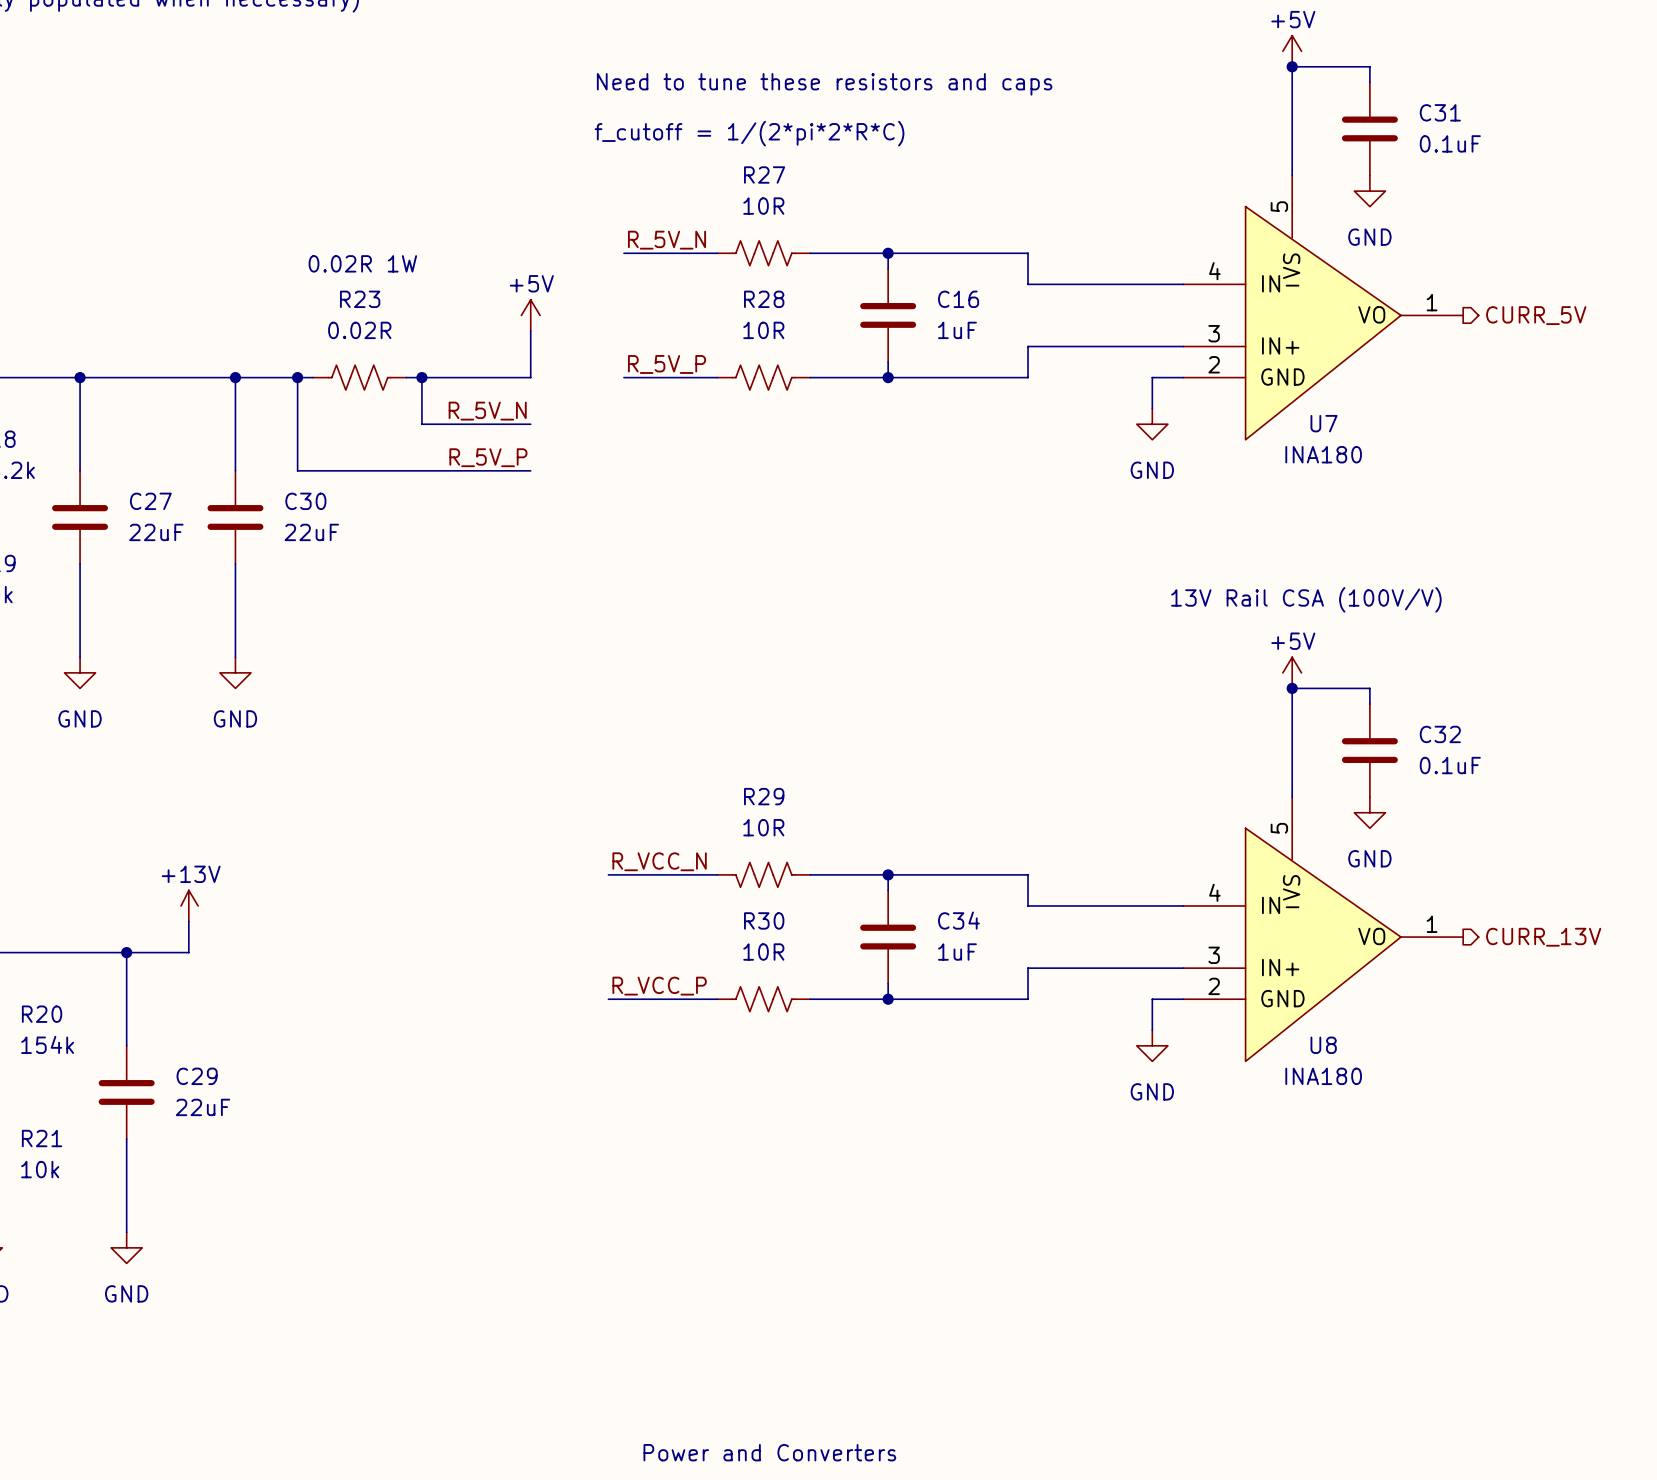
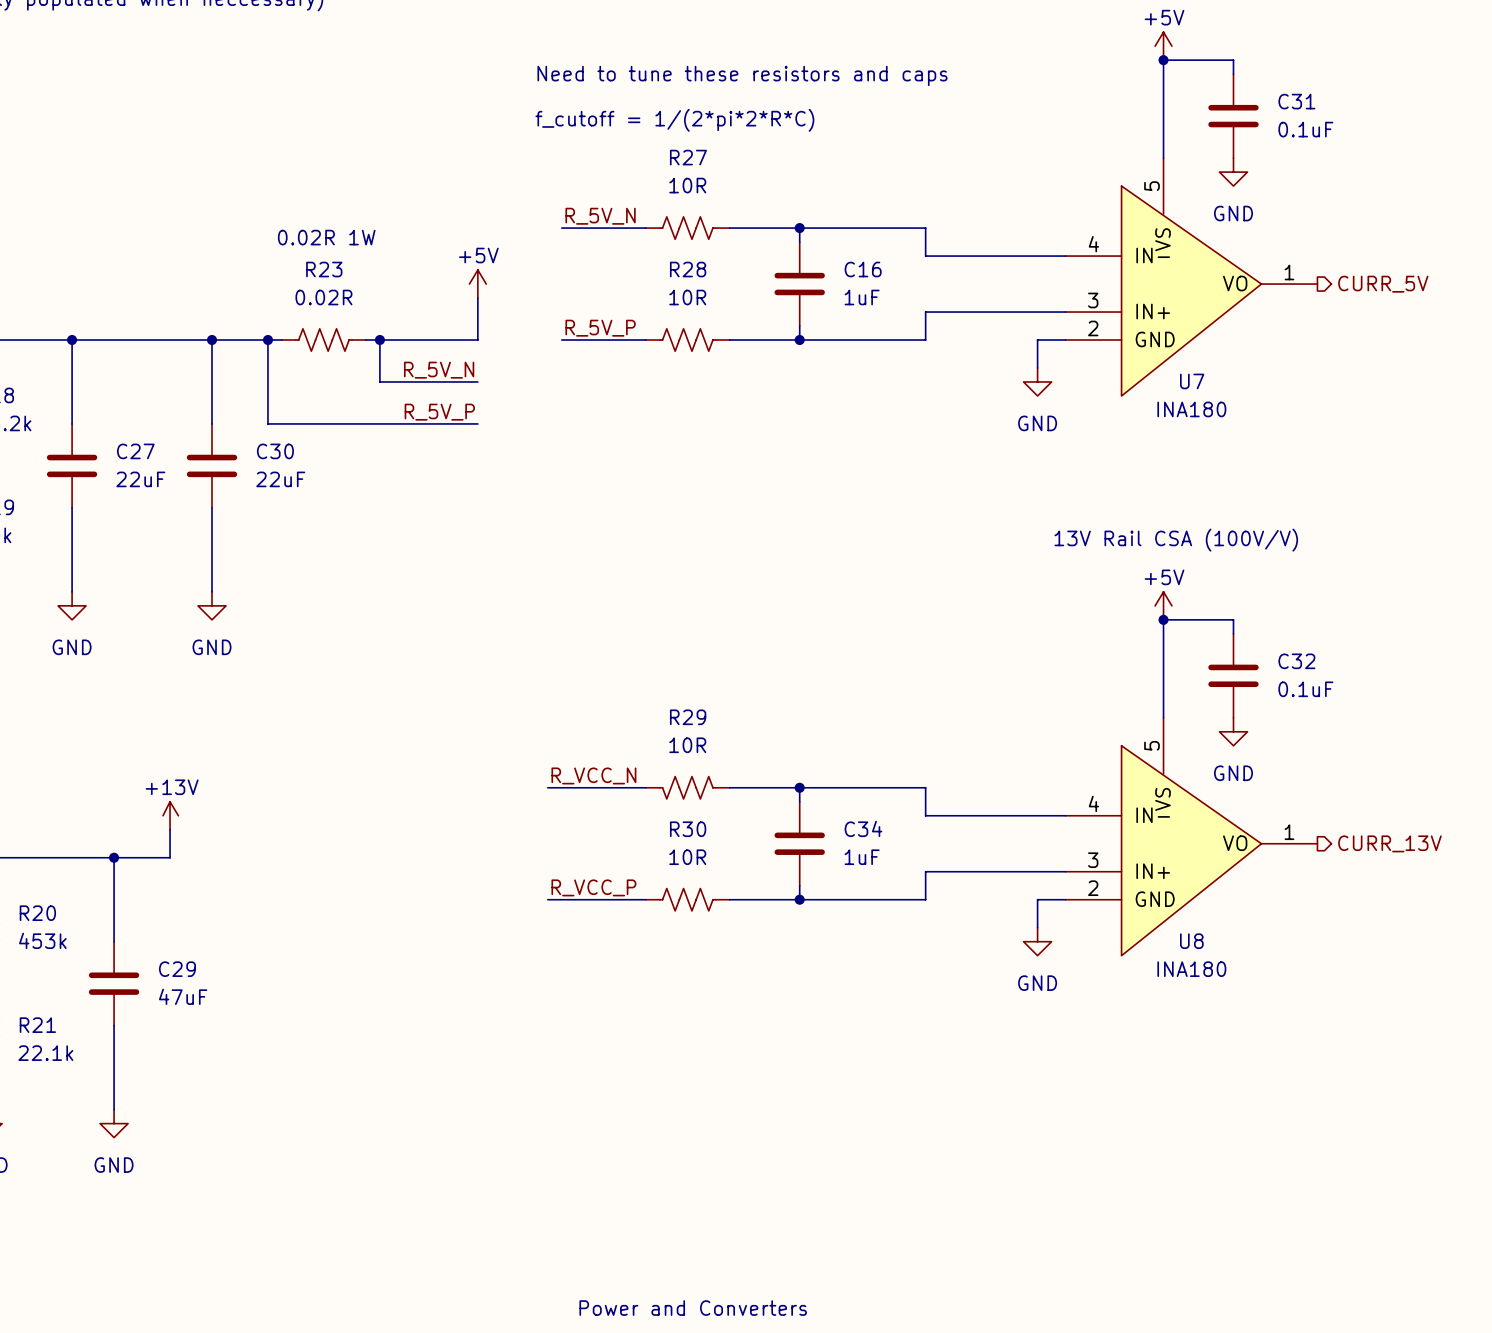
R20 value: 154k (47, 1044) -> 453k (42, 940)
C29 value: 22uF (203, 1107) -> 47uF (183, 996)
R21 value: 10k (40, 1169) -> 22.1k (45, 1053)

